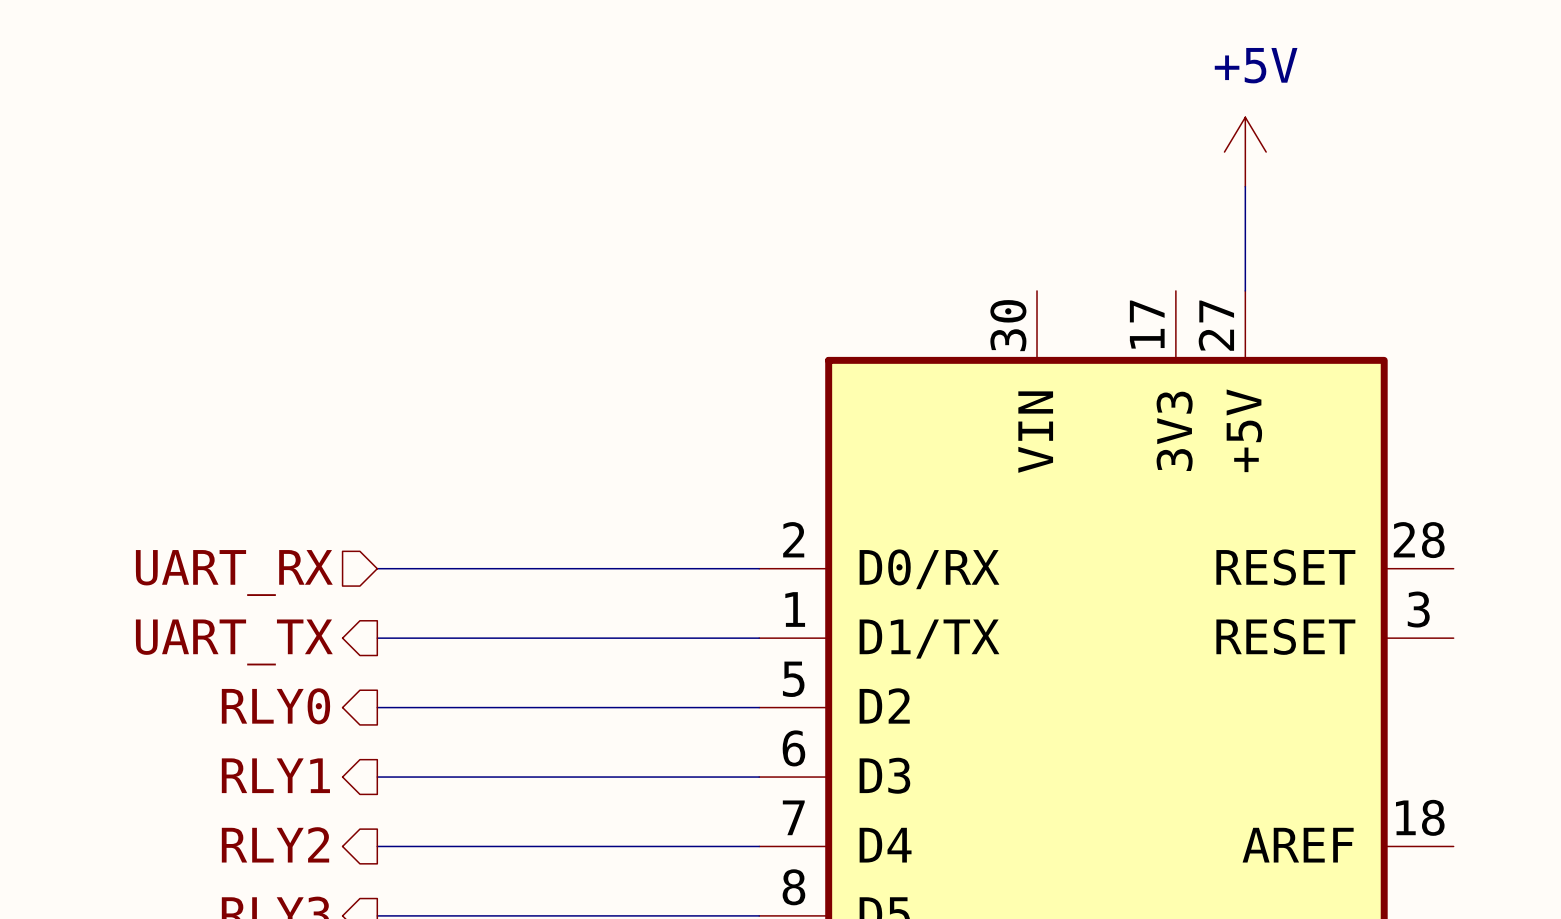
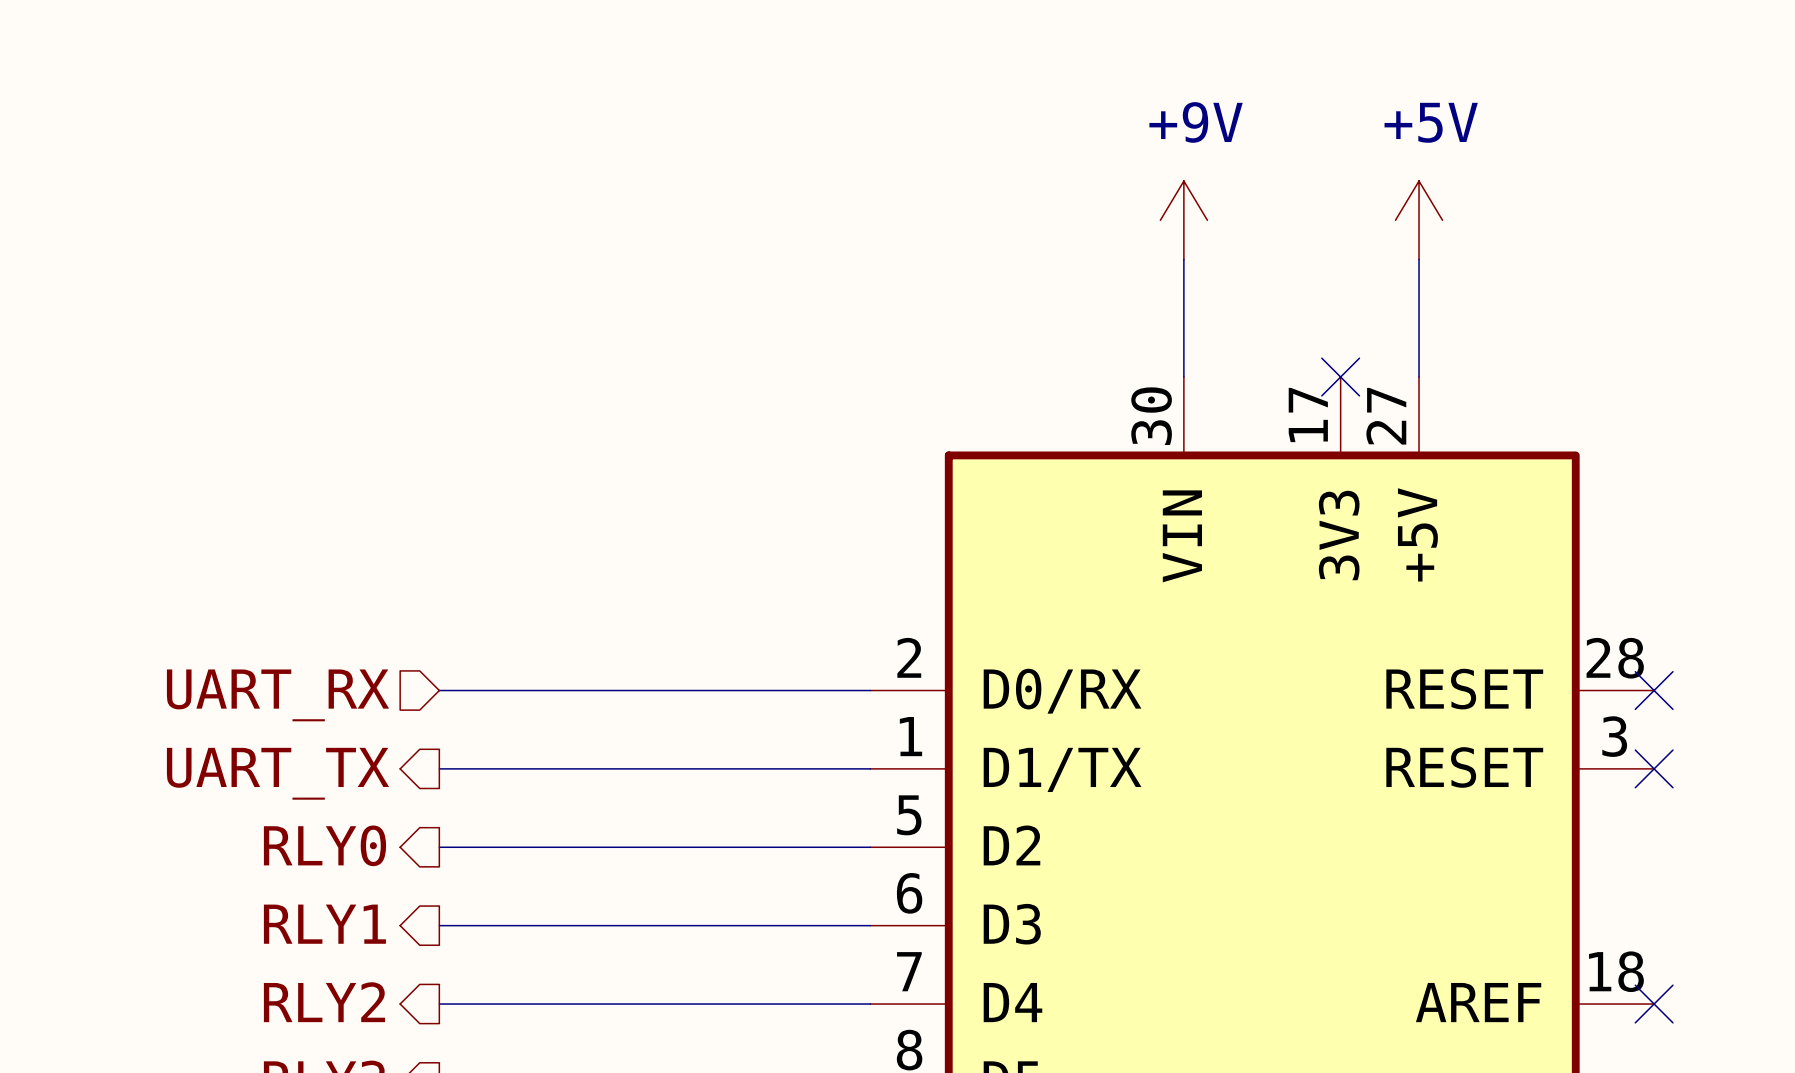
power symbol: none -> +9V (1183, 220)
wire: none -> (1183, 259) (1183, 377)
no-connect mark: none -> (1340, 377)
no-connect mark: none -> (1654, 690)
no-connect mark: none -> (1654, 768)
no-connect mark: none -> (1654, 1004)

